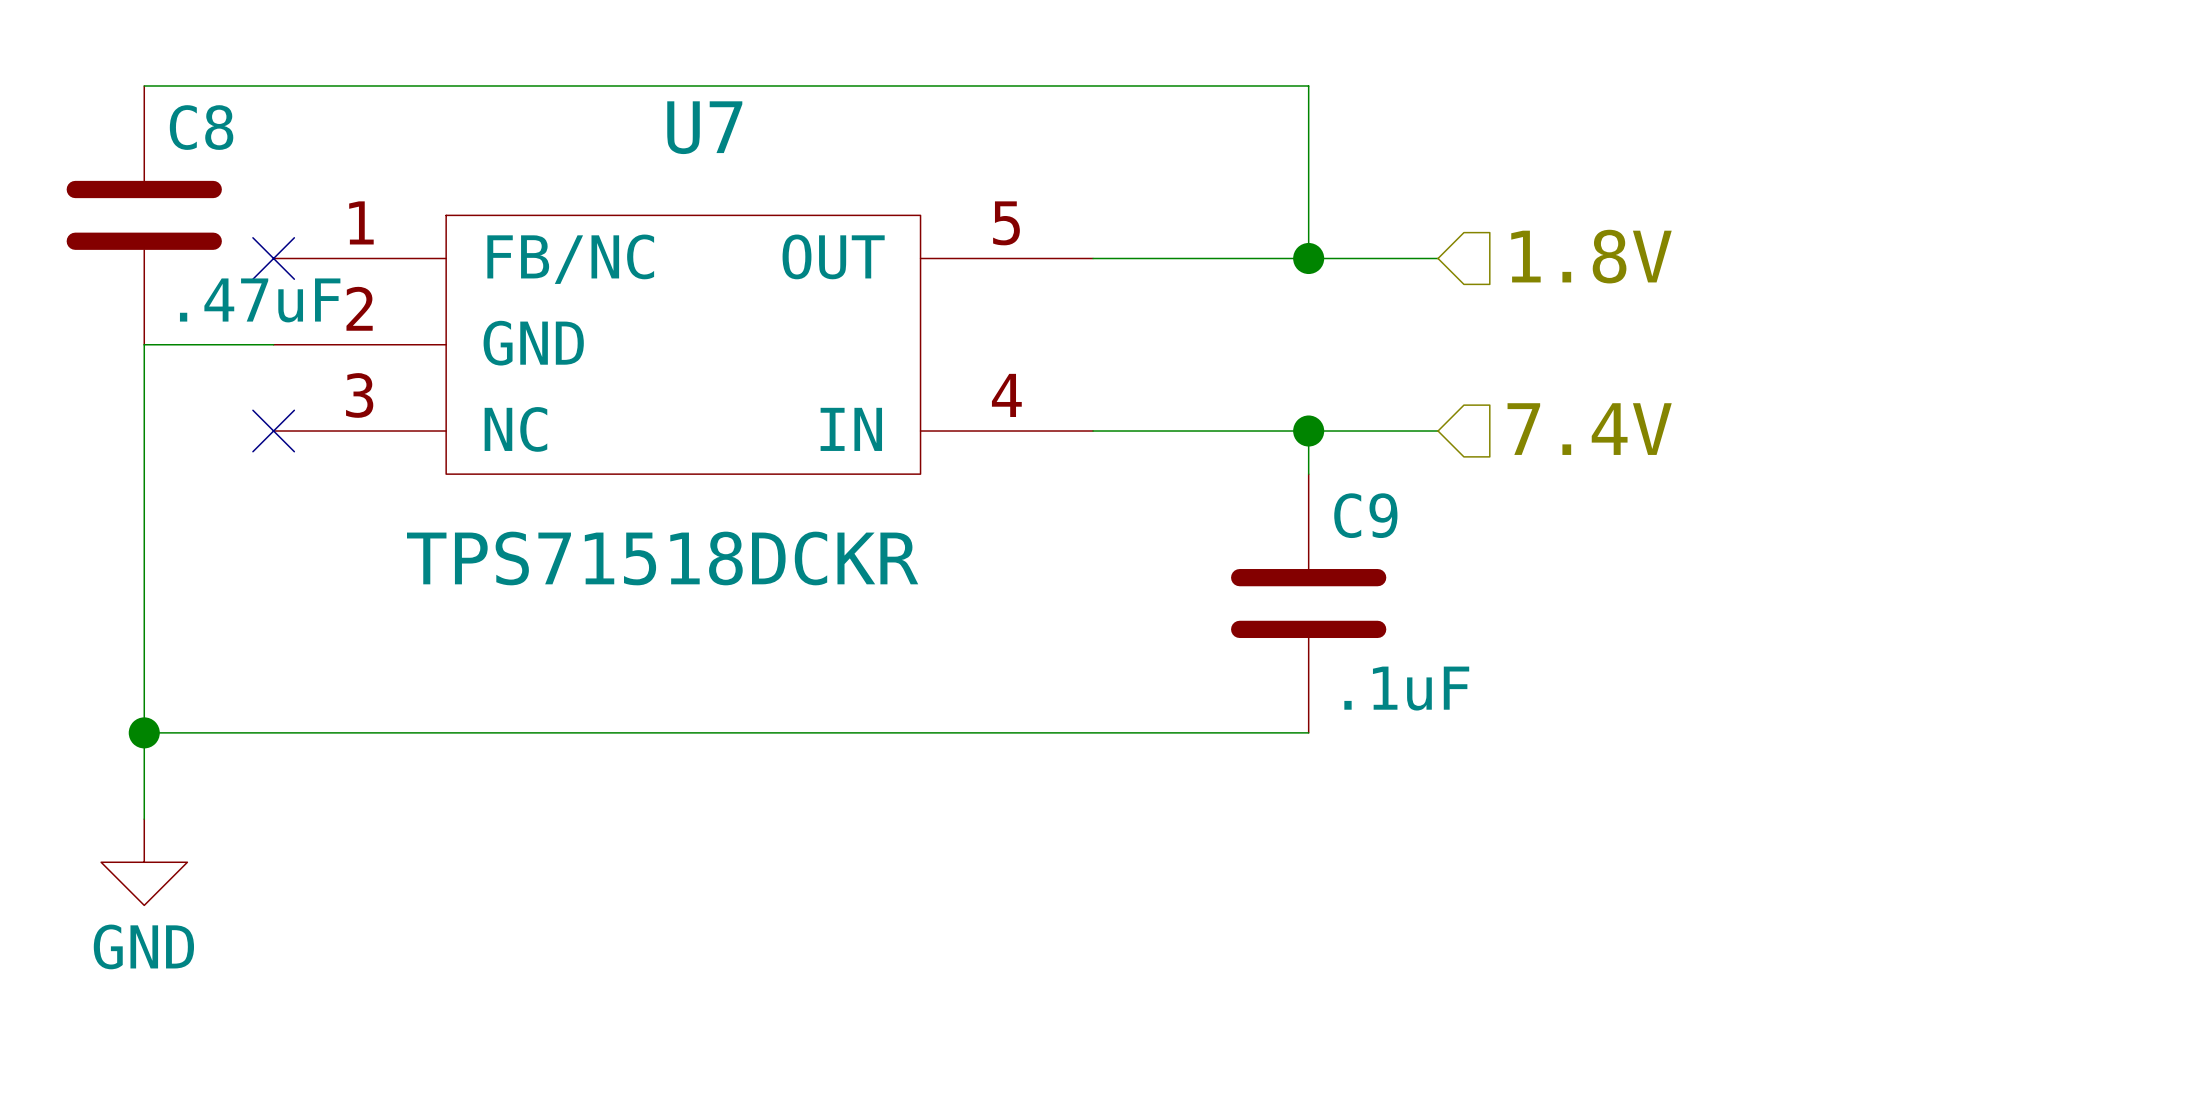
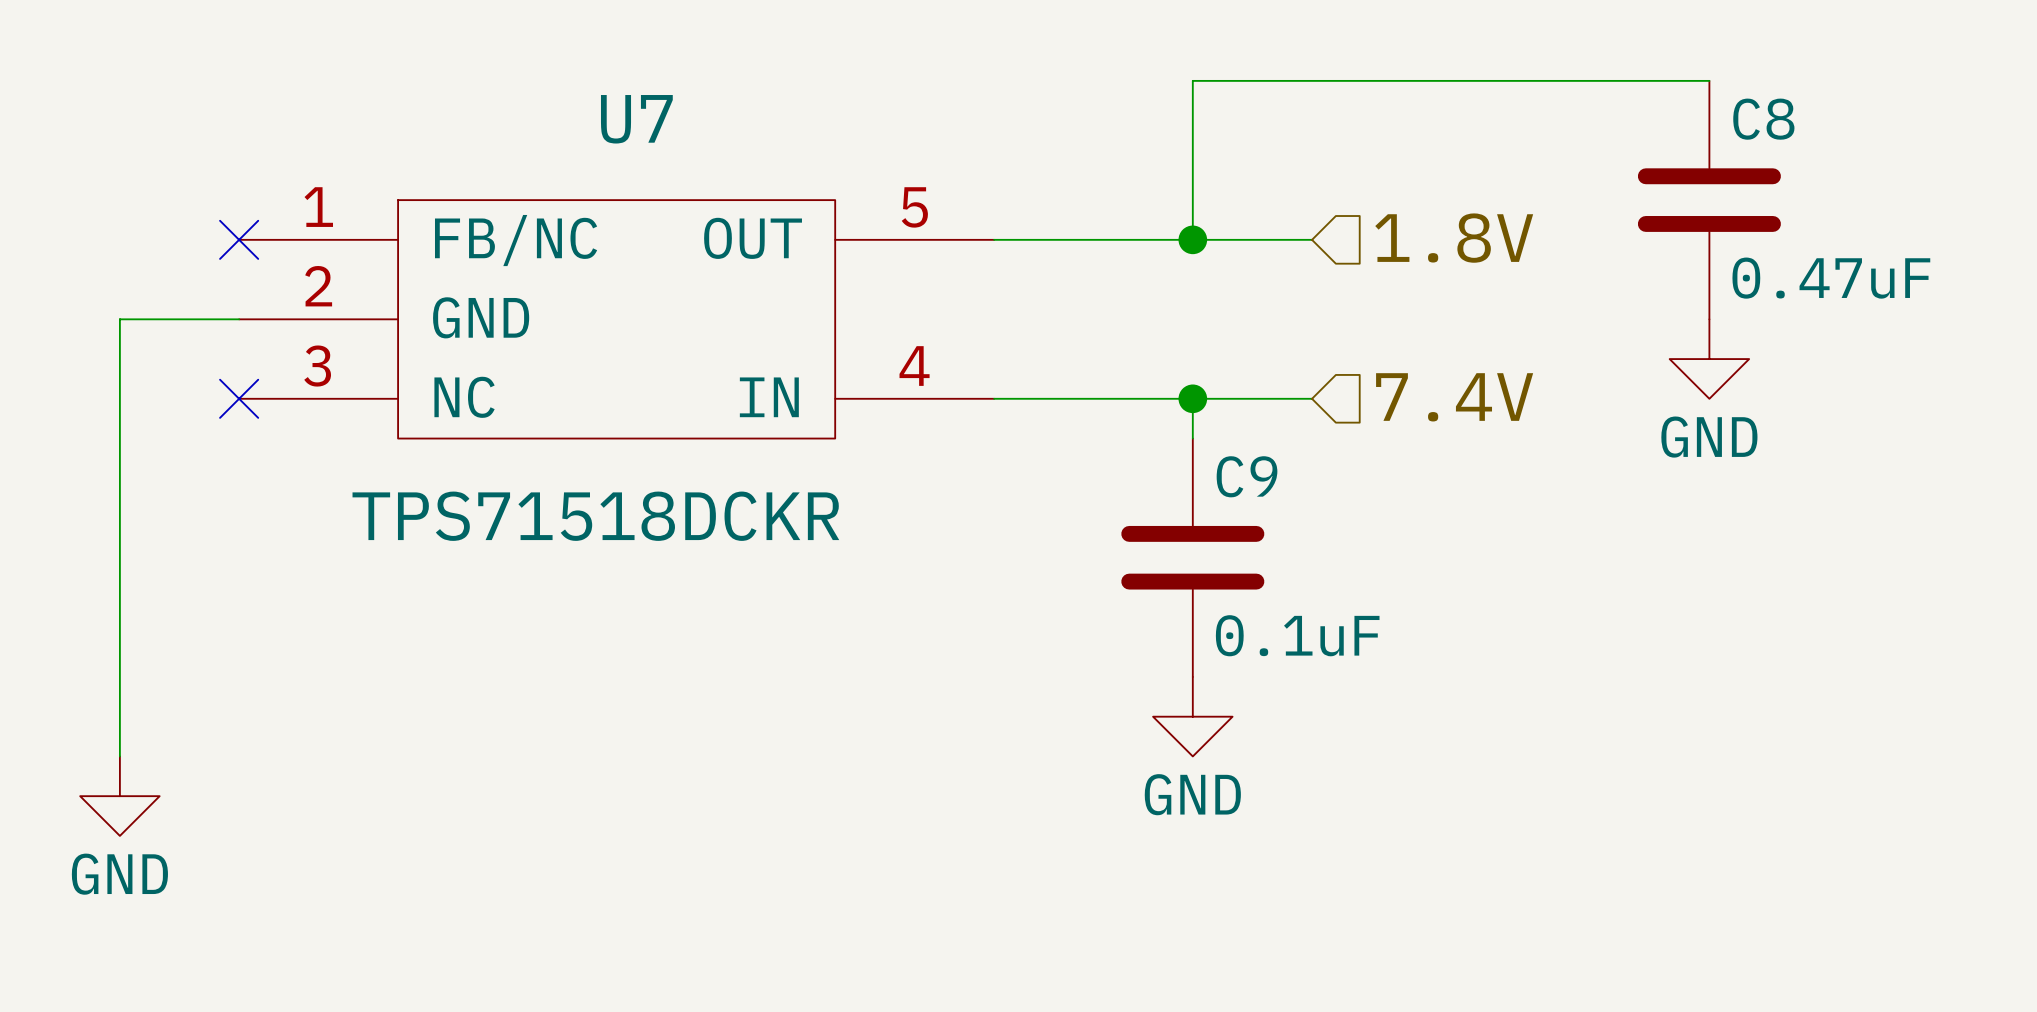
wire: (144, 85) (1308, 85) -> (1709, 80) (1192, 80)
C8 position: (144, 215) -> (1709, 200)
C8 value: .47uF (260, 300) -> 0.47uF (1831, 278)
power symbol: none -> GND (1709, 359)
C9 value: .1uF (1406, 688) -> 0.1uF (1297, 635)
wire: (144, 732) (1308, 732) -> none
junction: (144, 732) -> none
power symbol: none -> GND (1192, 716)

